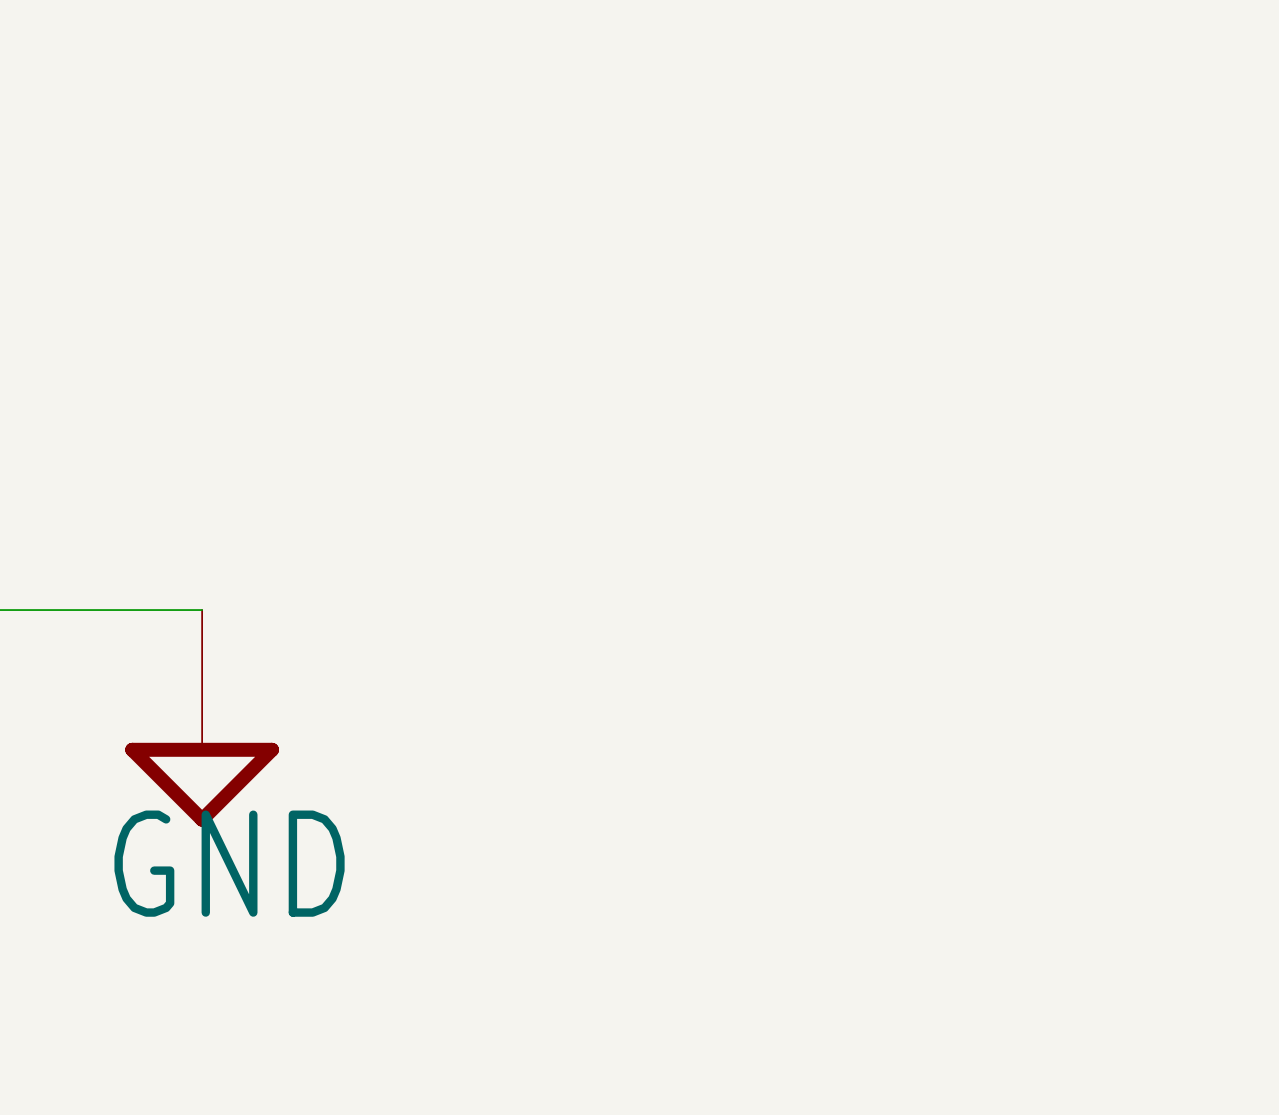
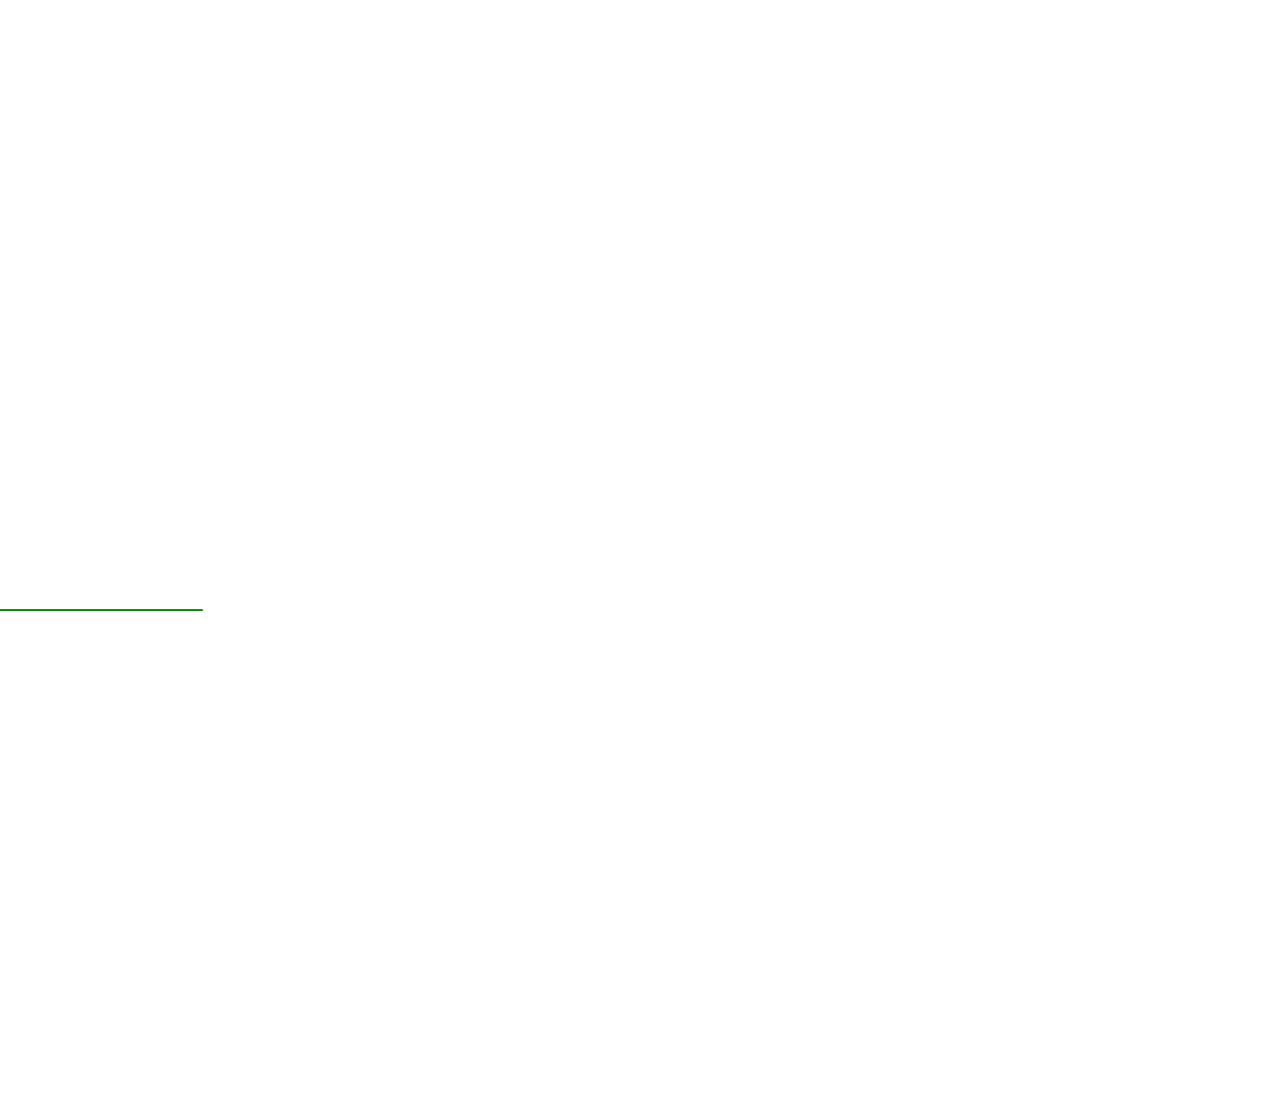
power symbol: GND (202, 718) -> none

